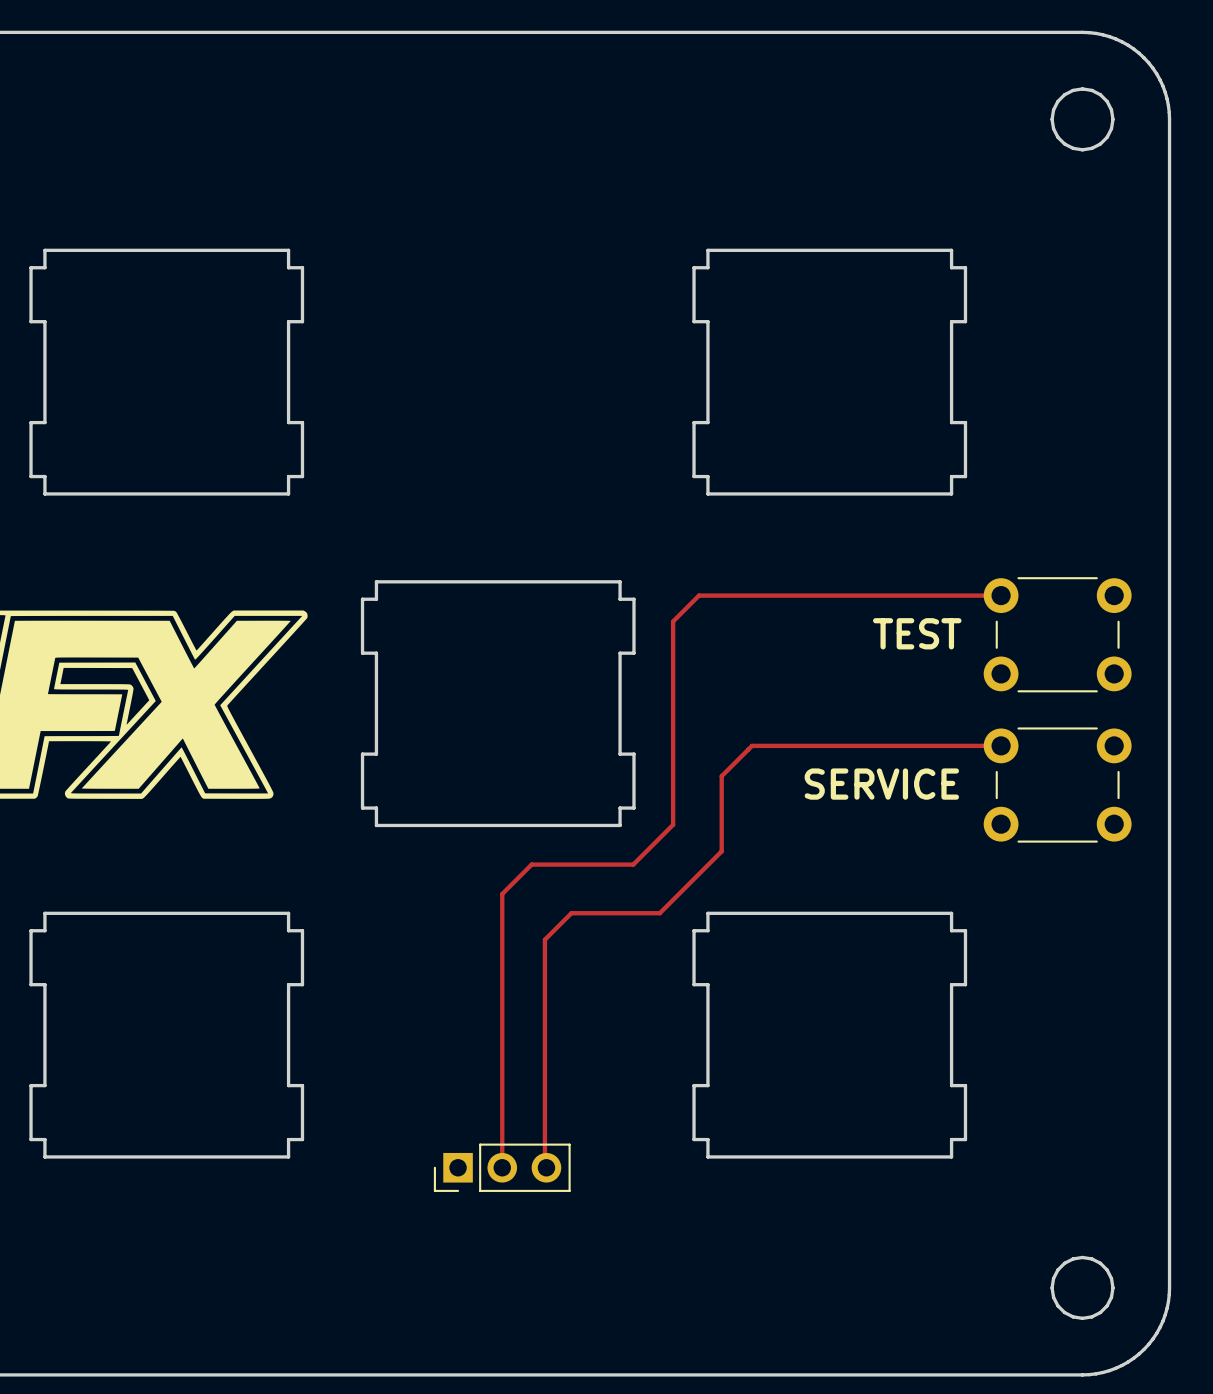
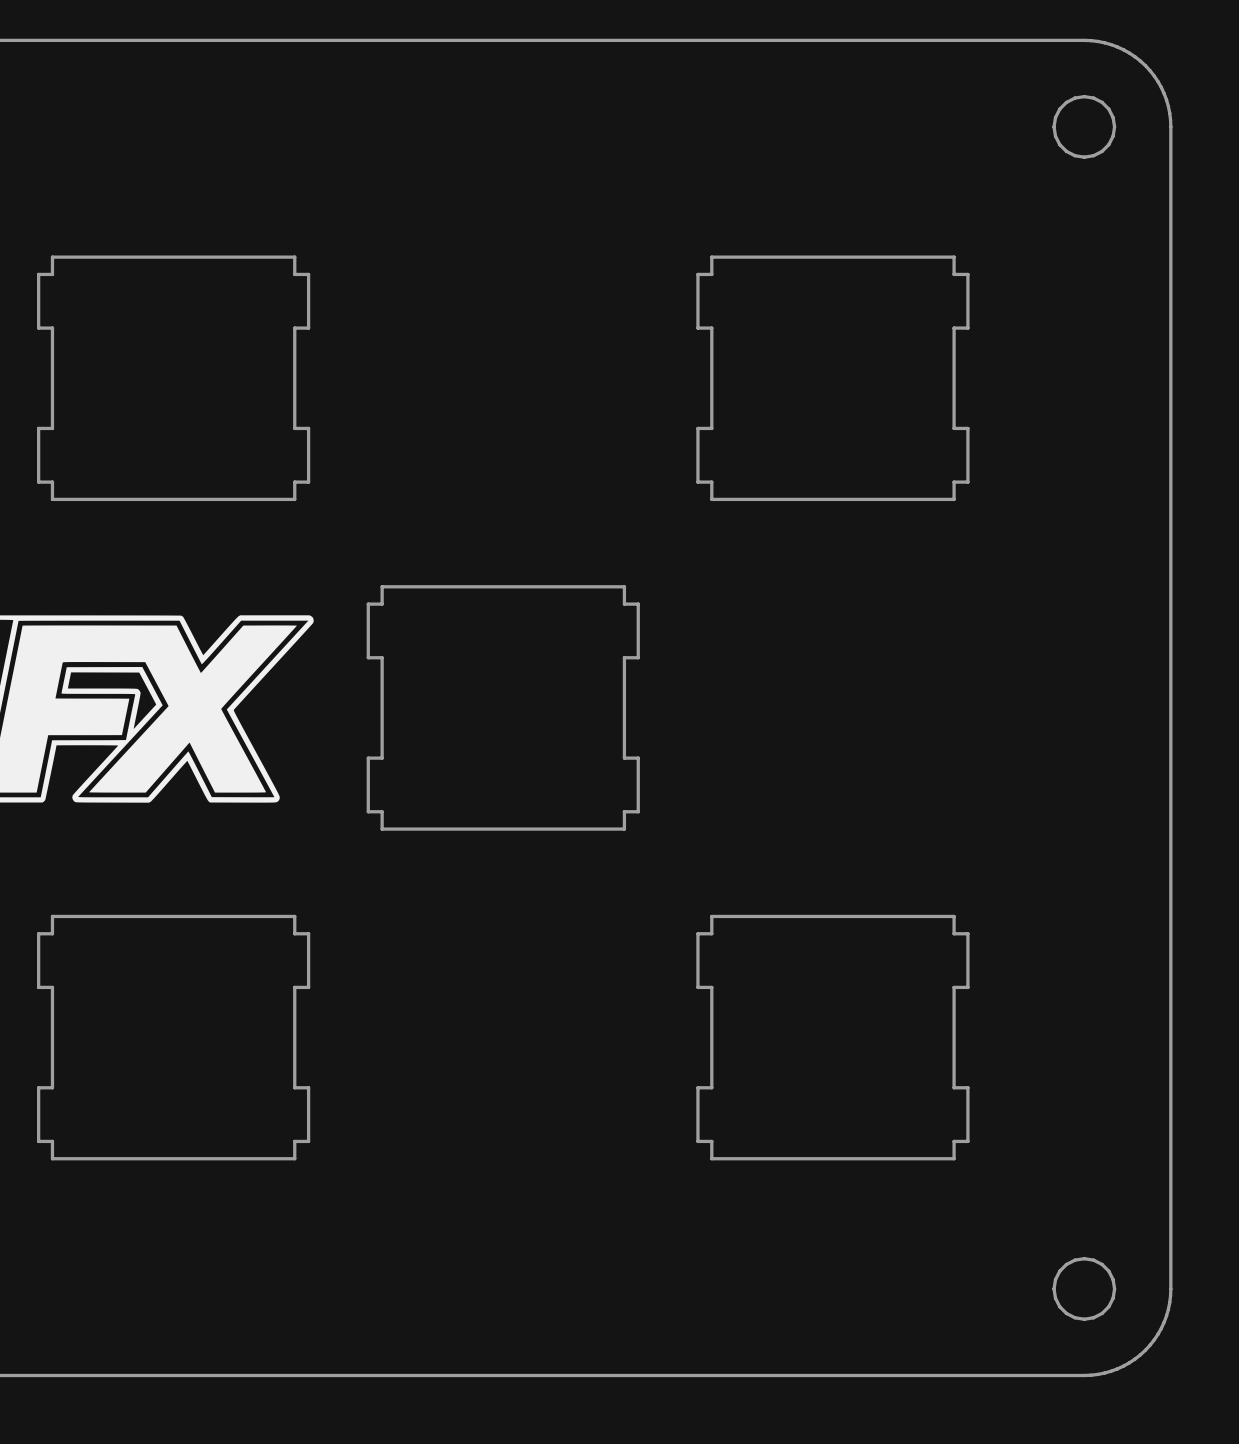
track: (1001, 595) (699, 595) (673, 621) (673, 824) (633, 864) (531, 864) (502, 894) (502, 1167) -> none
text: TEST (917, 633) -> none
part: (1057, 634) -> none
track: (1000, 745) (752, 745) (721, 776) (721, 851) (659, 913) (571, 913) (544, 939) (544, 1166) (546, 1167) -> none
text: SERVICE (881, 784) -> none
part: (1057, 785) -> none
part: (502, 1167) -> none

